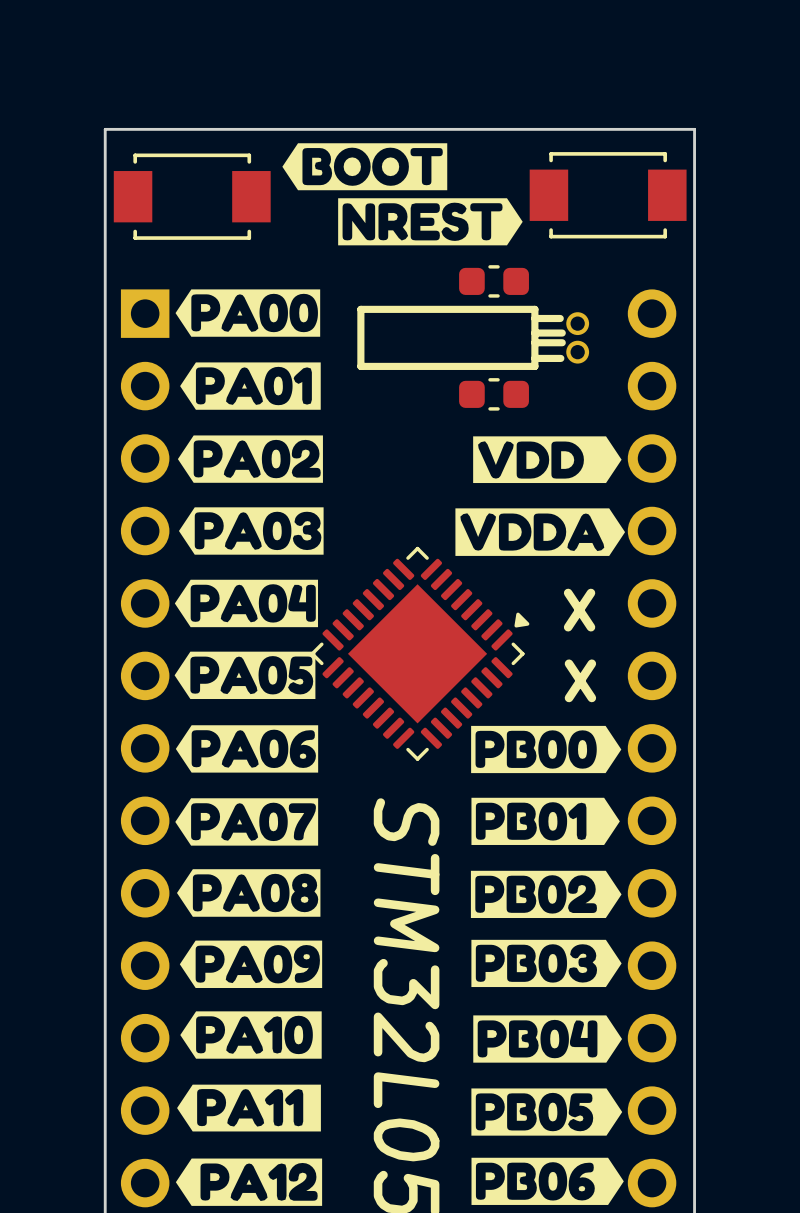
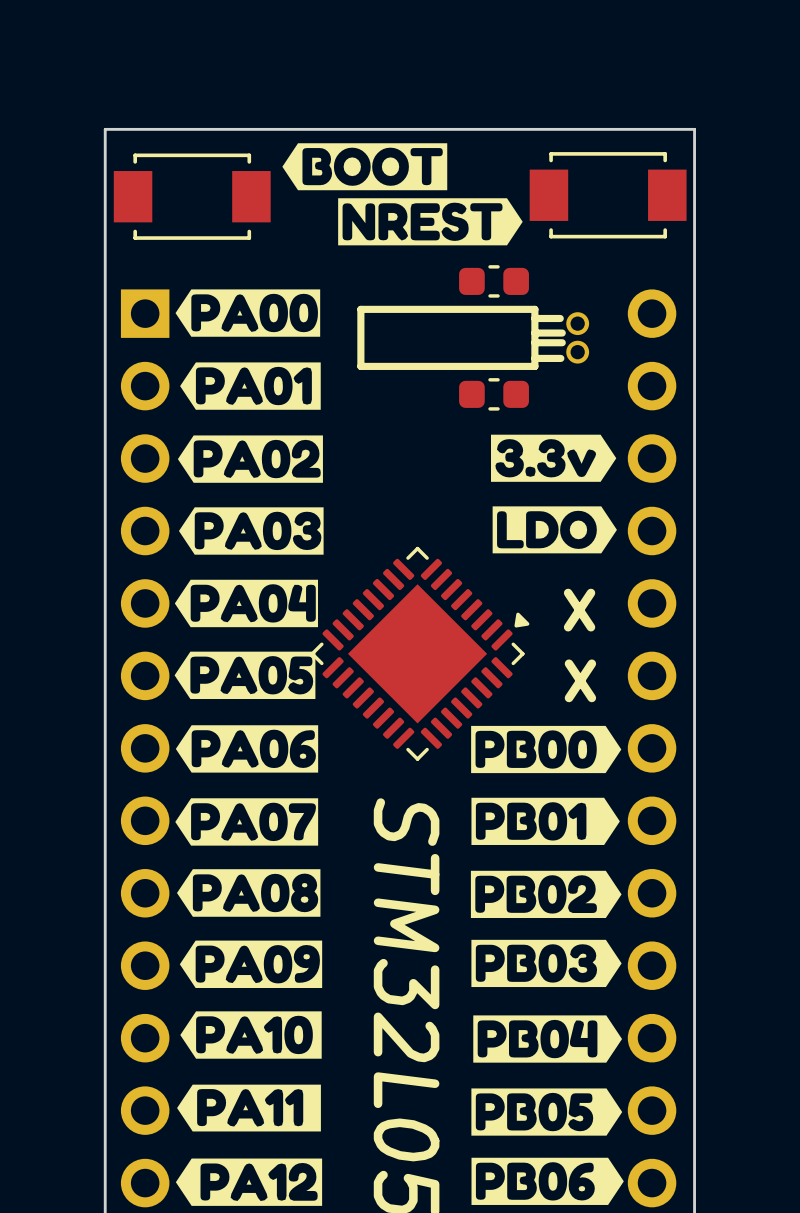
drawing shape: [473, 436, 622, 484] -> [490, 434, 617, 482]
drawing shape: [455, 508, 626, 556] -> [492, 506, 617, 554]

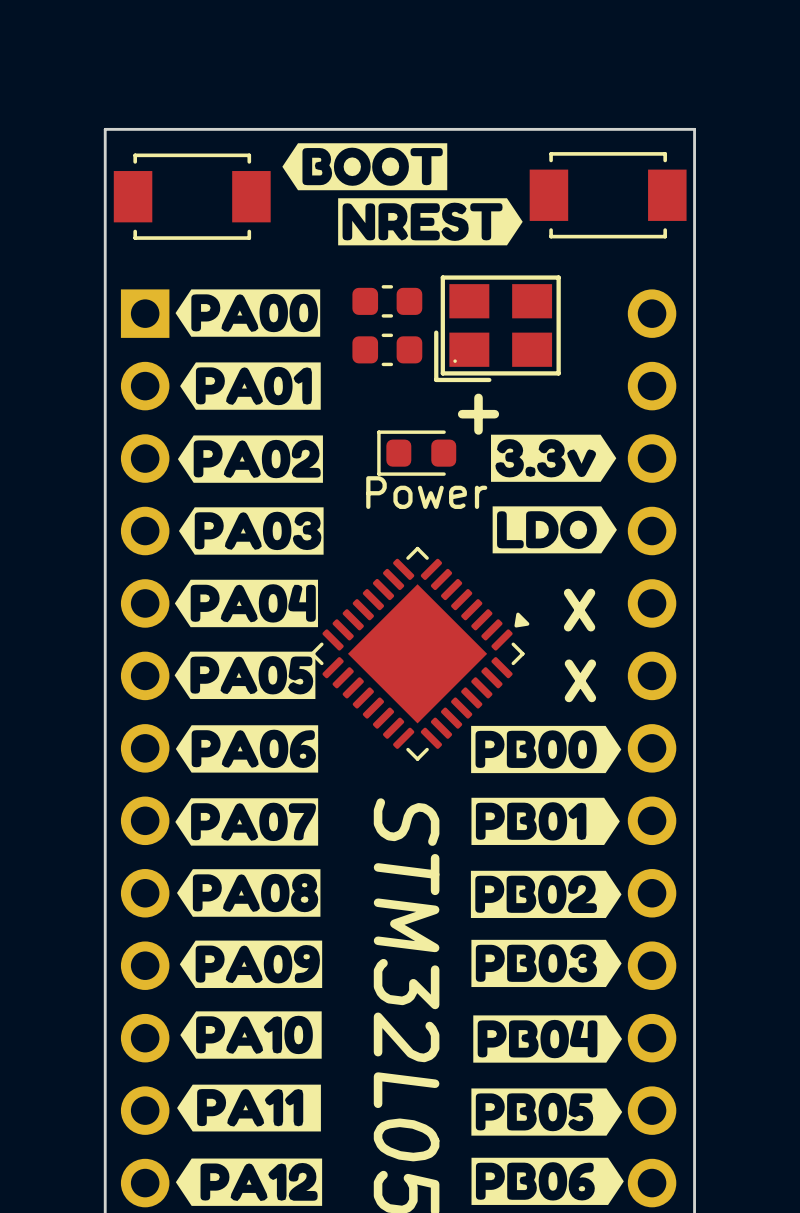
part: (494, 281) -> none
part: none -> (387, 301)
part: none -> (497, 328)
part: (473, 337) -> none
part: none -> (387, 349)
part: (494, 394) -> none
text: none -> + (478, 414)
part: none -> (416, 453)
text: none -> Power (426, 492)

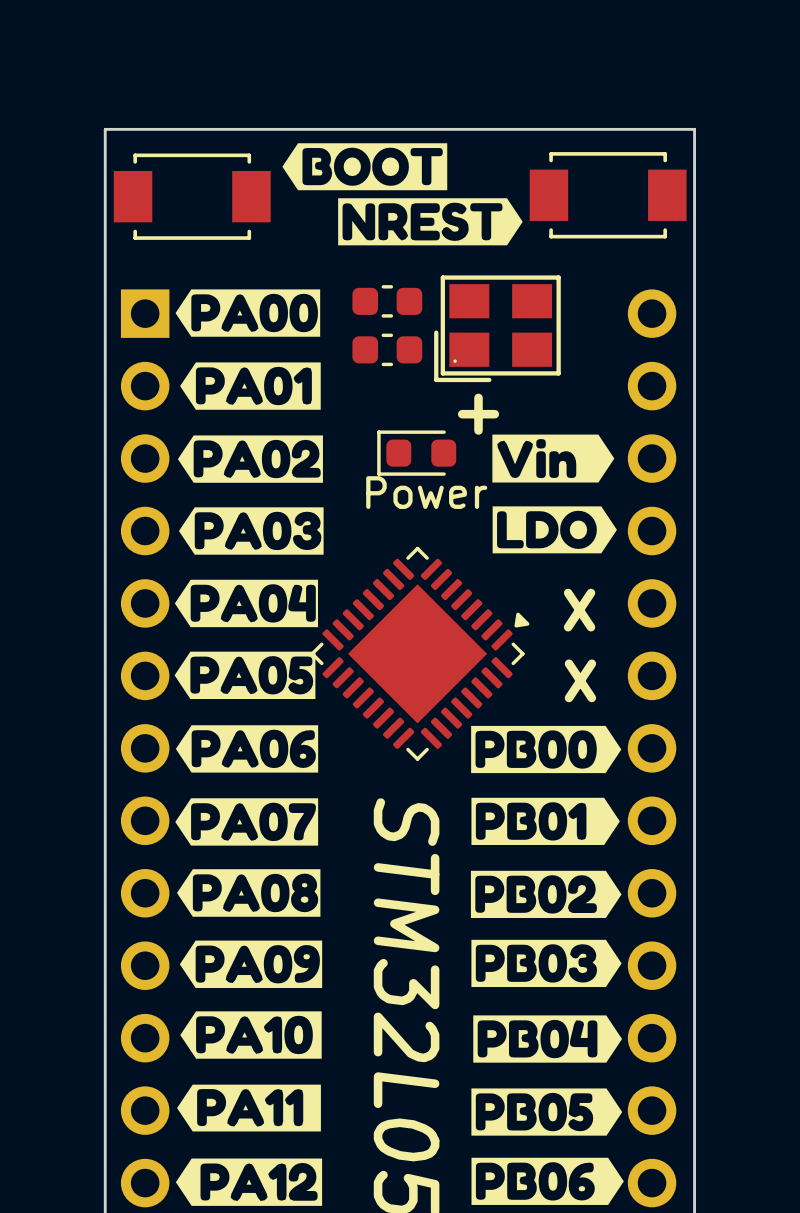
drawing shape: [490, 434, 617, 482] -> [492, 434, 615, 483]

